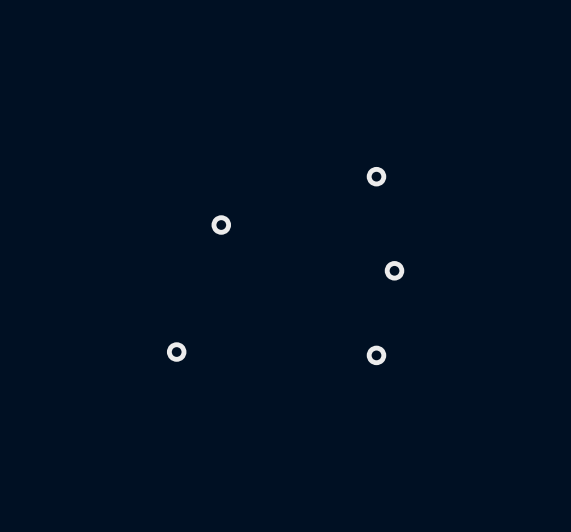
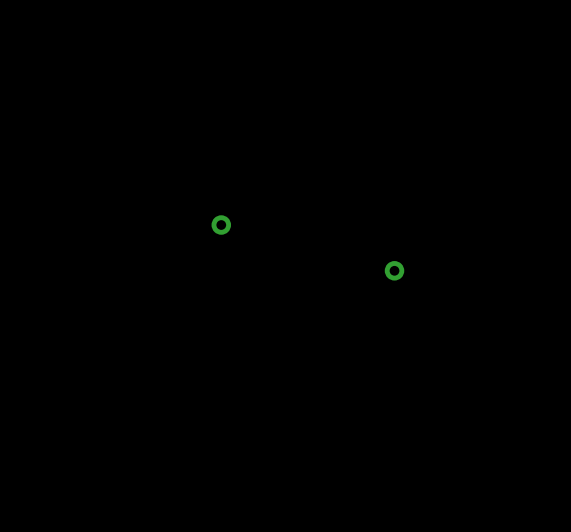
via: (376, 176) -> none
via: (176, 352) -> none
via: (376, 355) -> none

